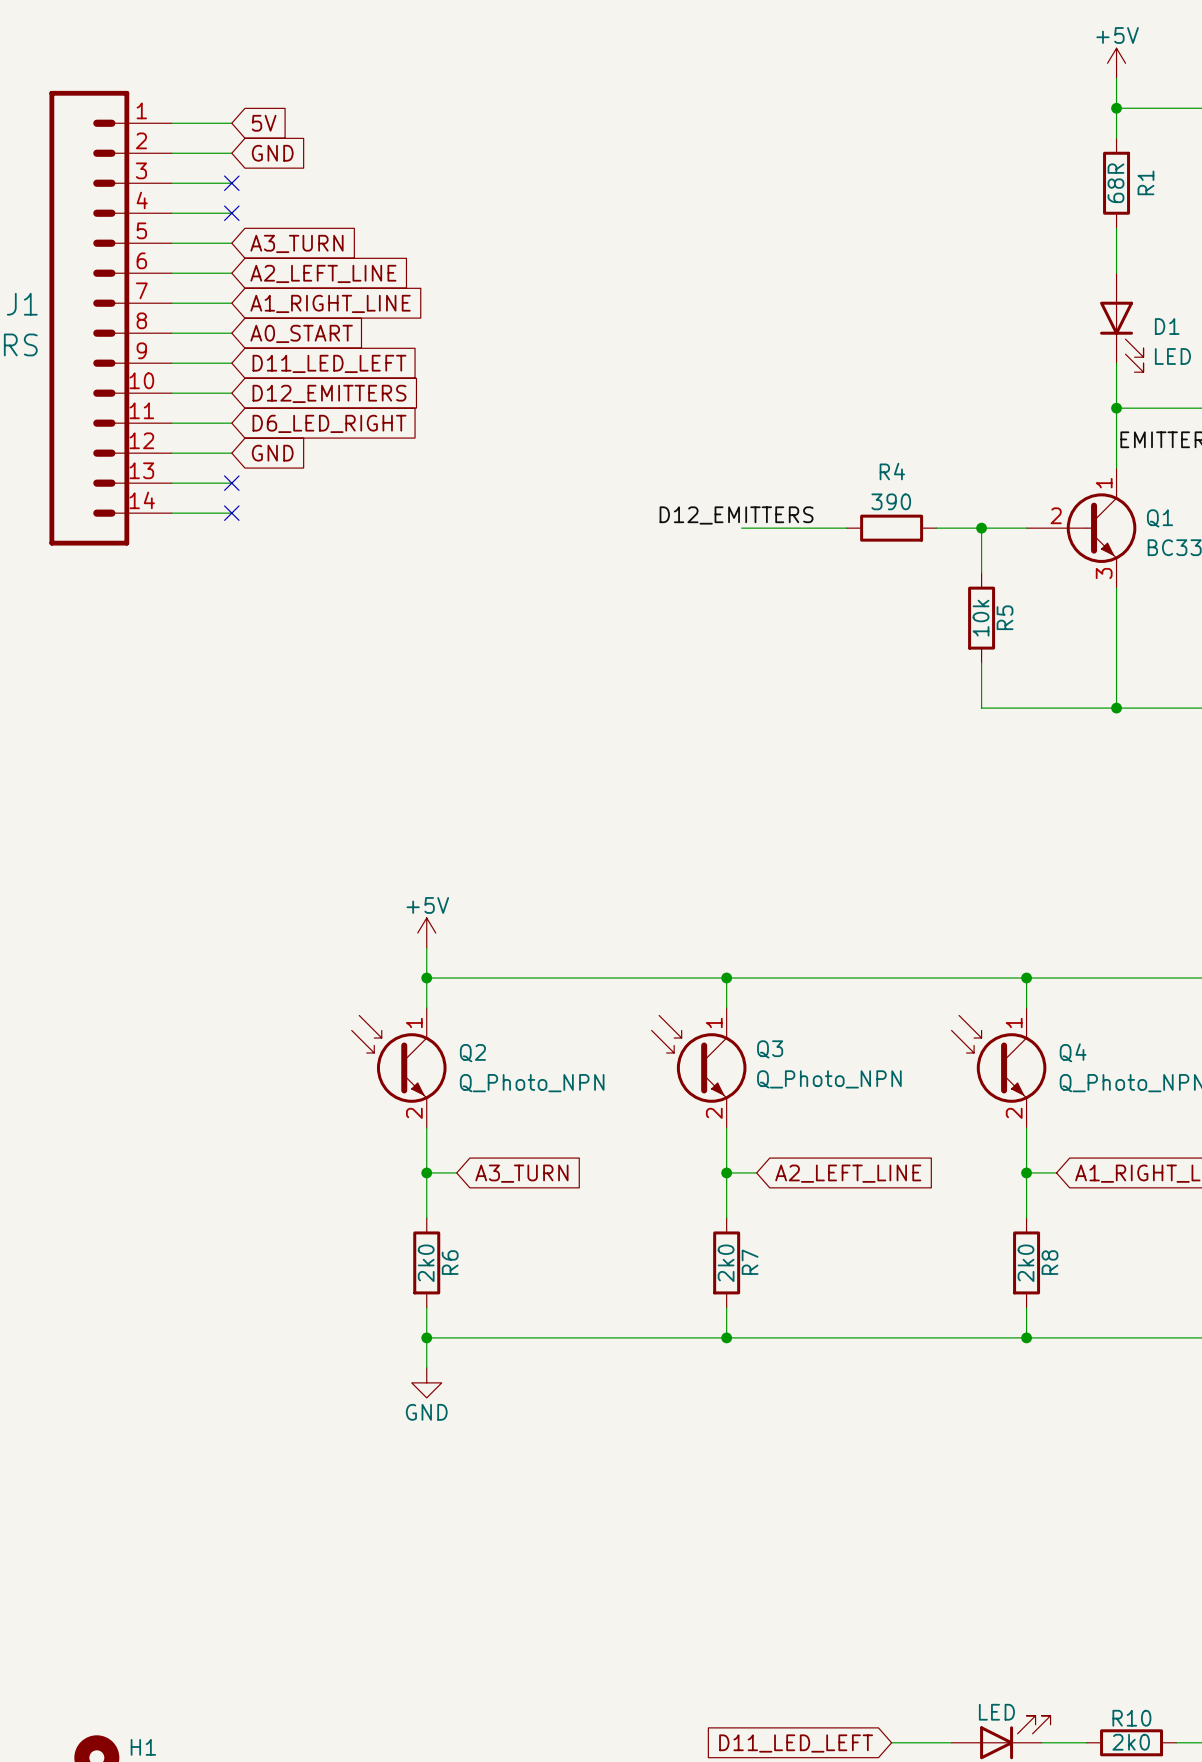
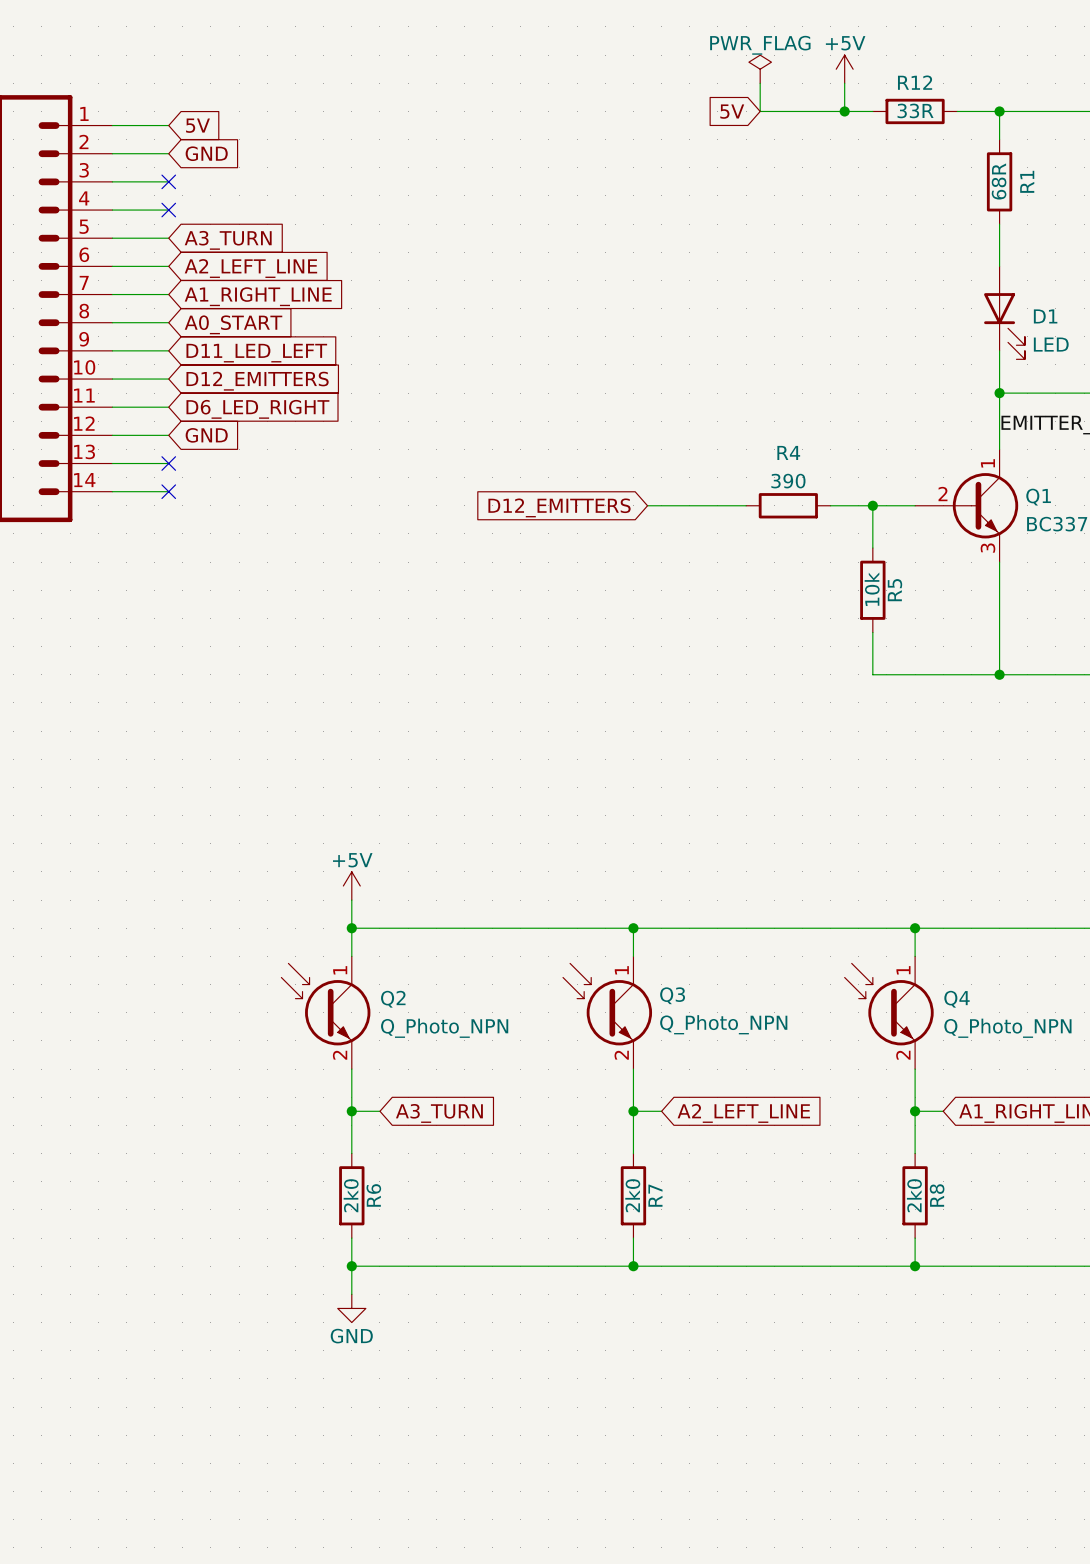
power symbol: none -> PWR_FLAG (760, 69)
power symbol position: +5V (1116, 63) -> +5V (844, 69)
wire: none -> (760, 83) (760, 111) (872, 111)
wire: none -> (844, 83) (844, 111)
wire: (1116, 78) (1116, 108) -> (957, 111) (999, 111)
global label: none -> 5V (732, 111)
junction: none -> (844, 111)
R12: none -> 33R (915, 111)
label: D12_EMITTERS (736, 515) -> none
global label: none -> D12_EMITTERS (559, 507)

